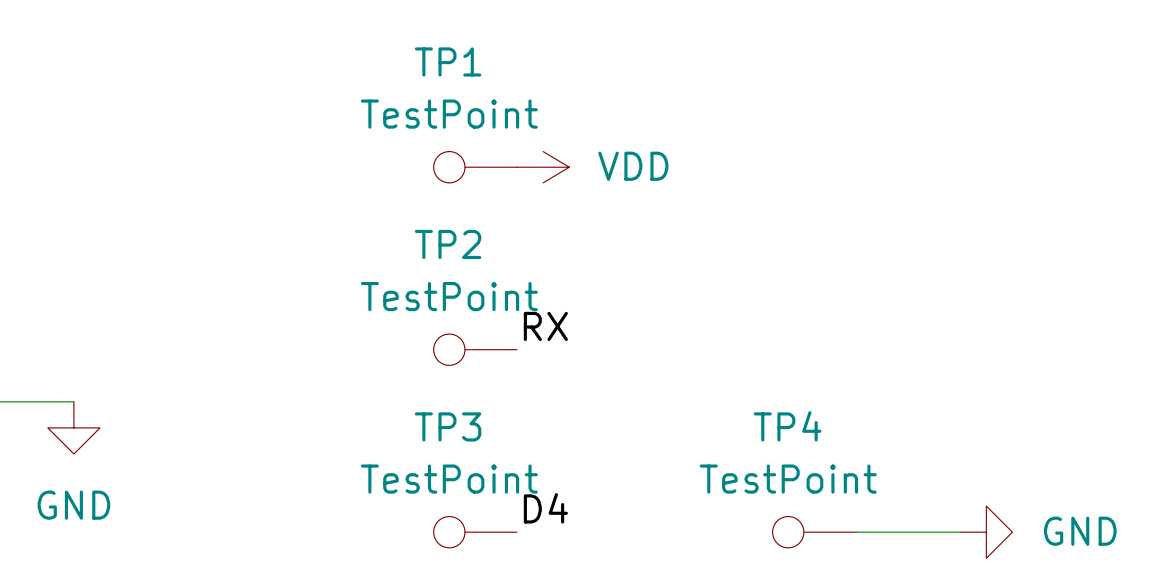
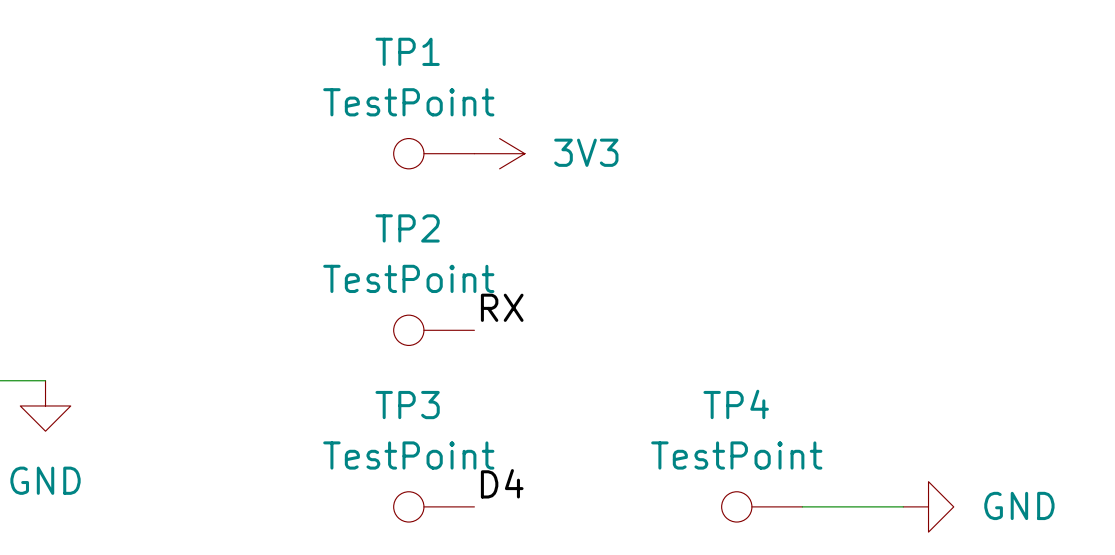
power symbol: VDD (543, 167) -> 3V3 (499, 153)

